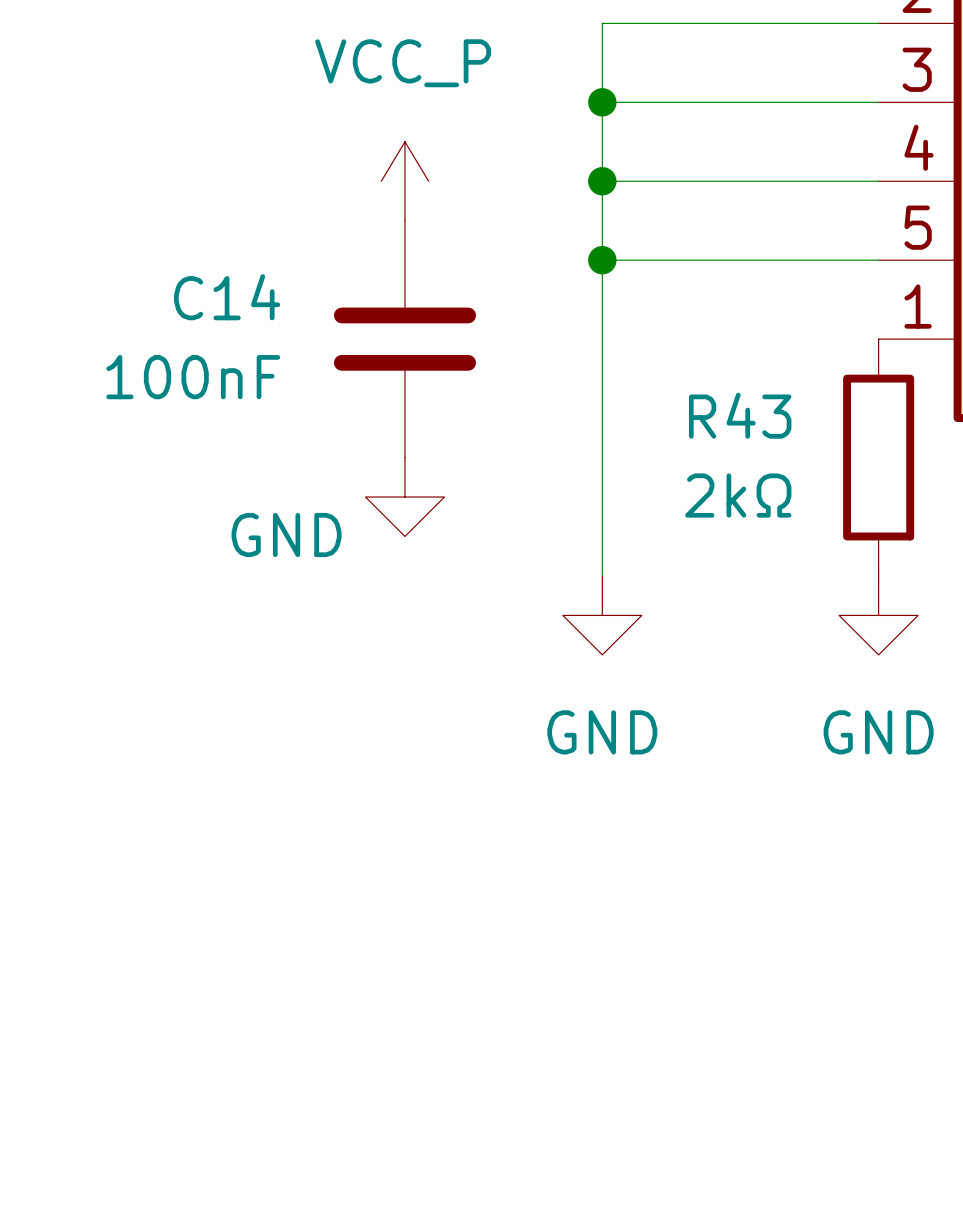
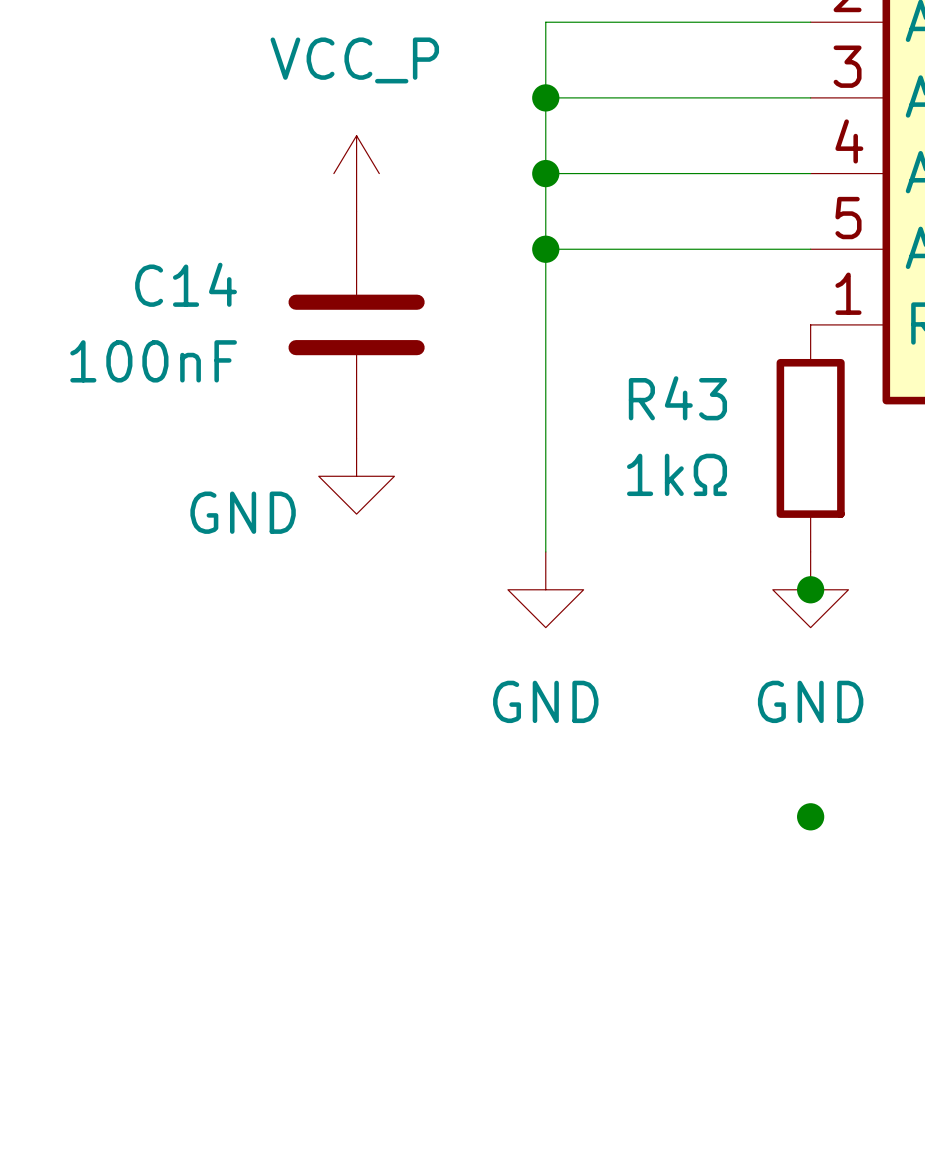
R43 value: 2kΩ (738, 495) -> 1kΩ (677, 474)
junction: none -> (810, 589)
junction: none -> (810, 816)

